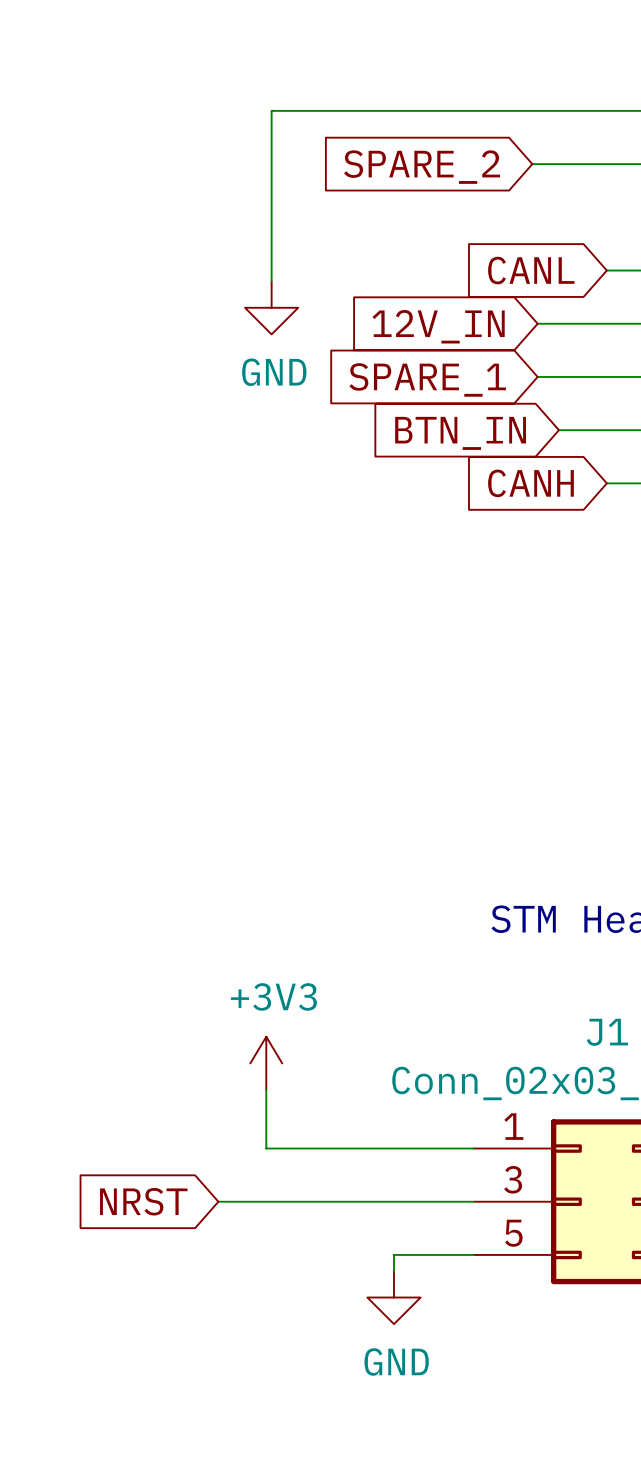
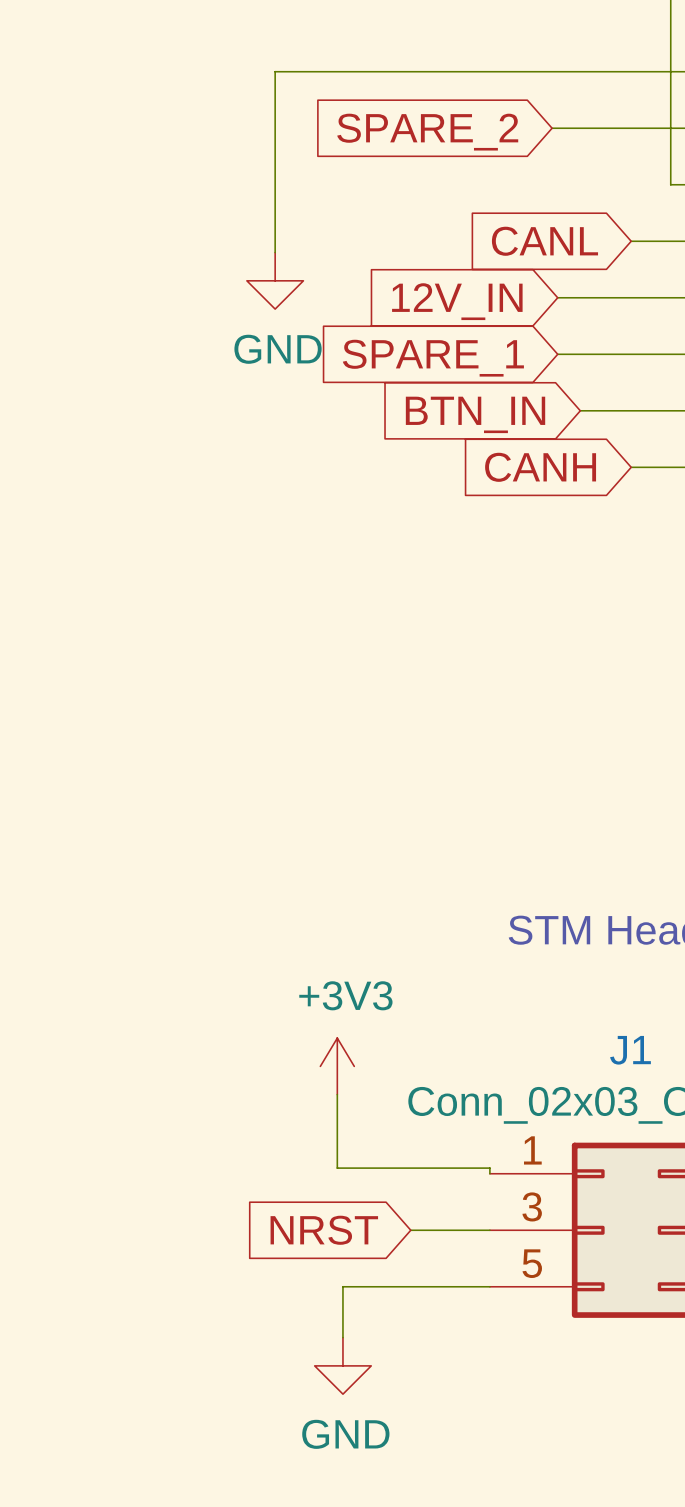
power symbol position: +3V3 (266, 1063) -> +3V3 (337, 1066)
wire: (266, 1089) (266, 1148) (473, 1148) -> (337, 1094) (337, 1168) (489, 1168) (489, 1173)
global label position: NRST (143, 1201) -> NRST (324, 1230)
wire: (218, 1201) (399, 1201) -> none
wire: (394, 1254) (394, 1270) -> (405, 1286) (342, 1286) (342, 1337)
power symbol position: GND (394, 1297) -> GND (342, 1365)

